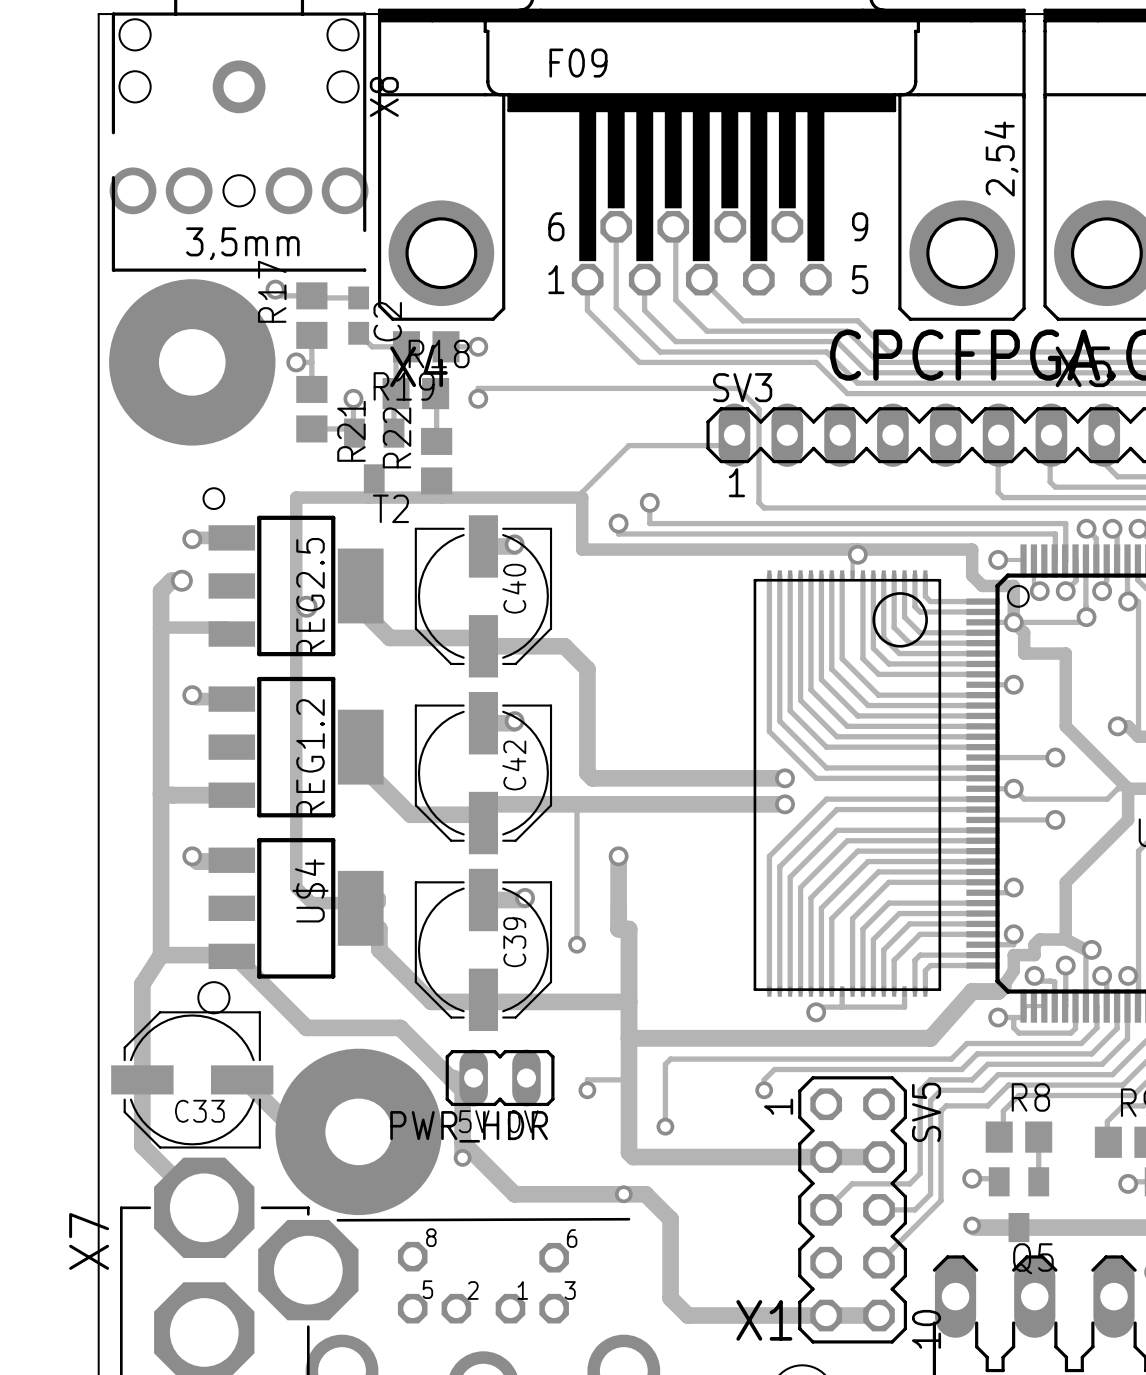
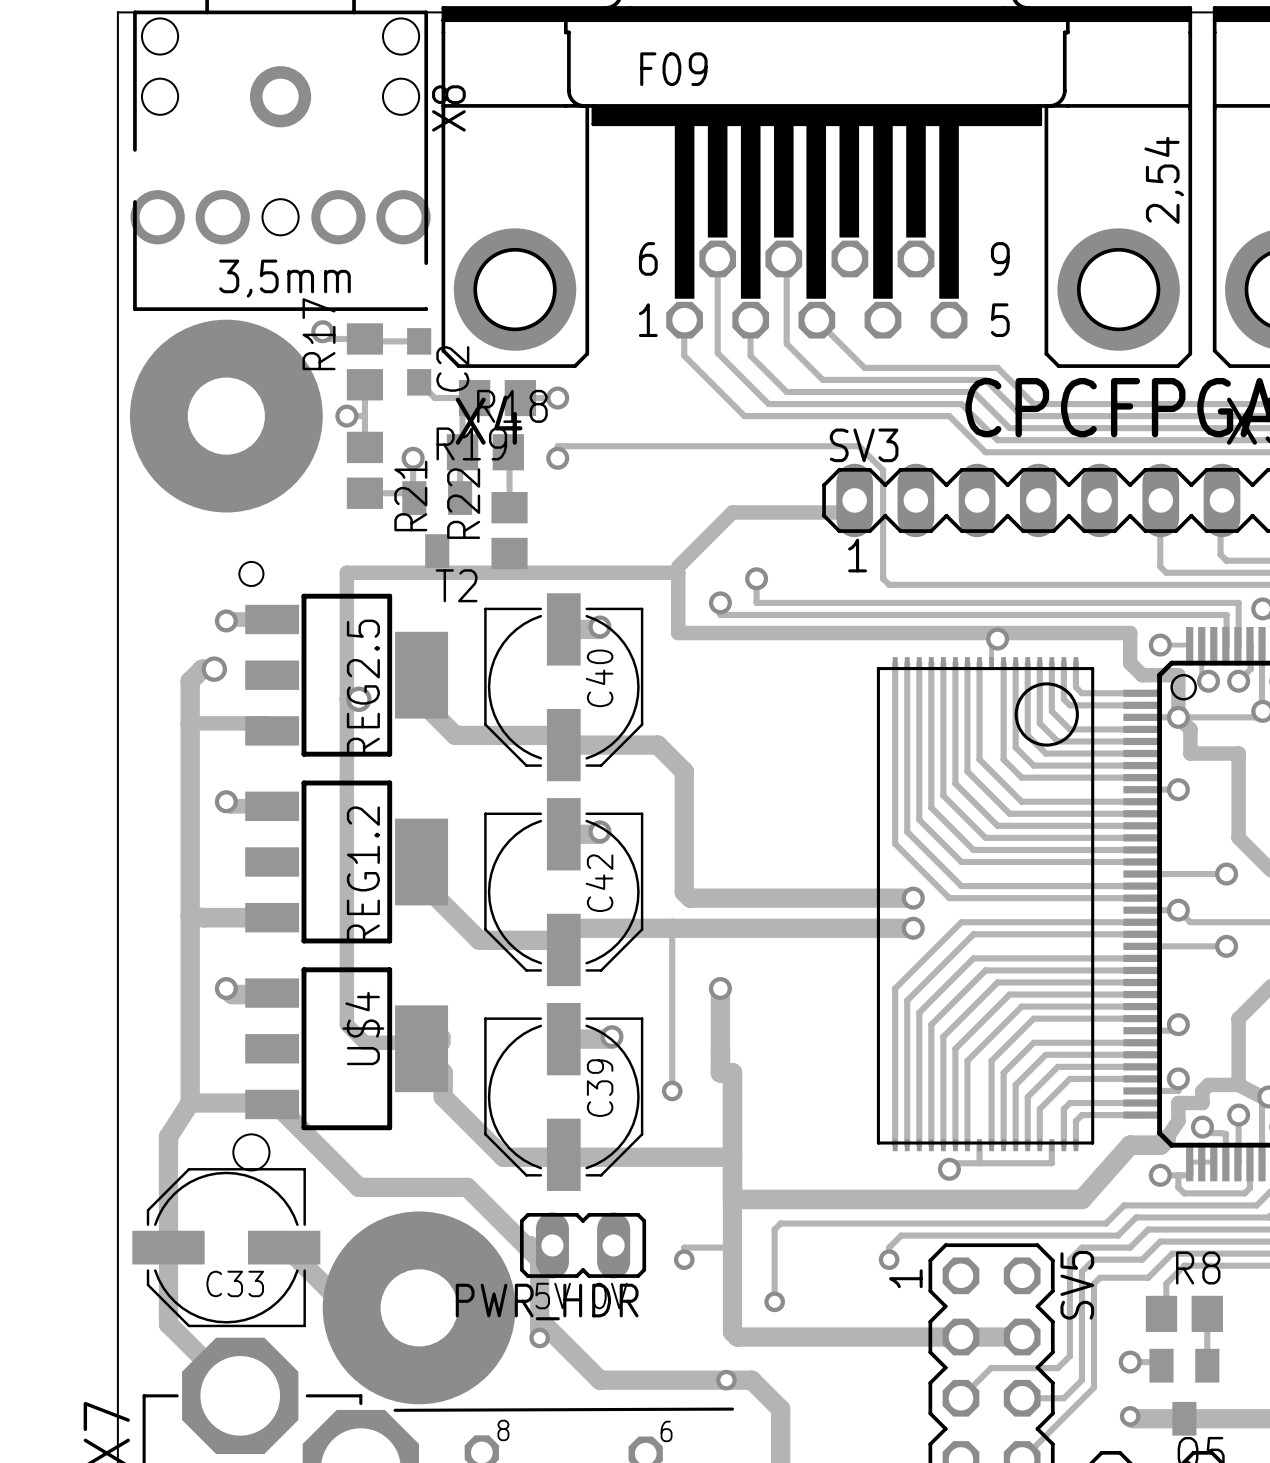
track width: thin (733, 445) (629, 445) (582, 492) -> thick (852, 512) (732, 512) (678, 566)

